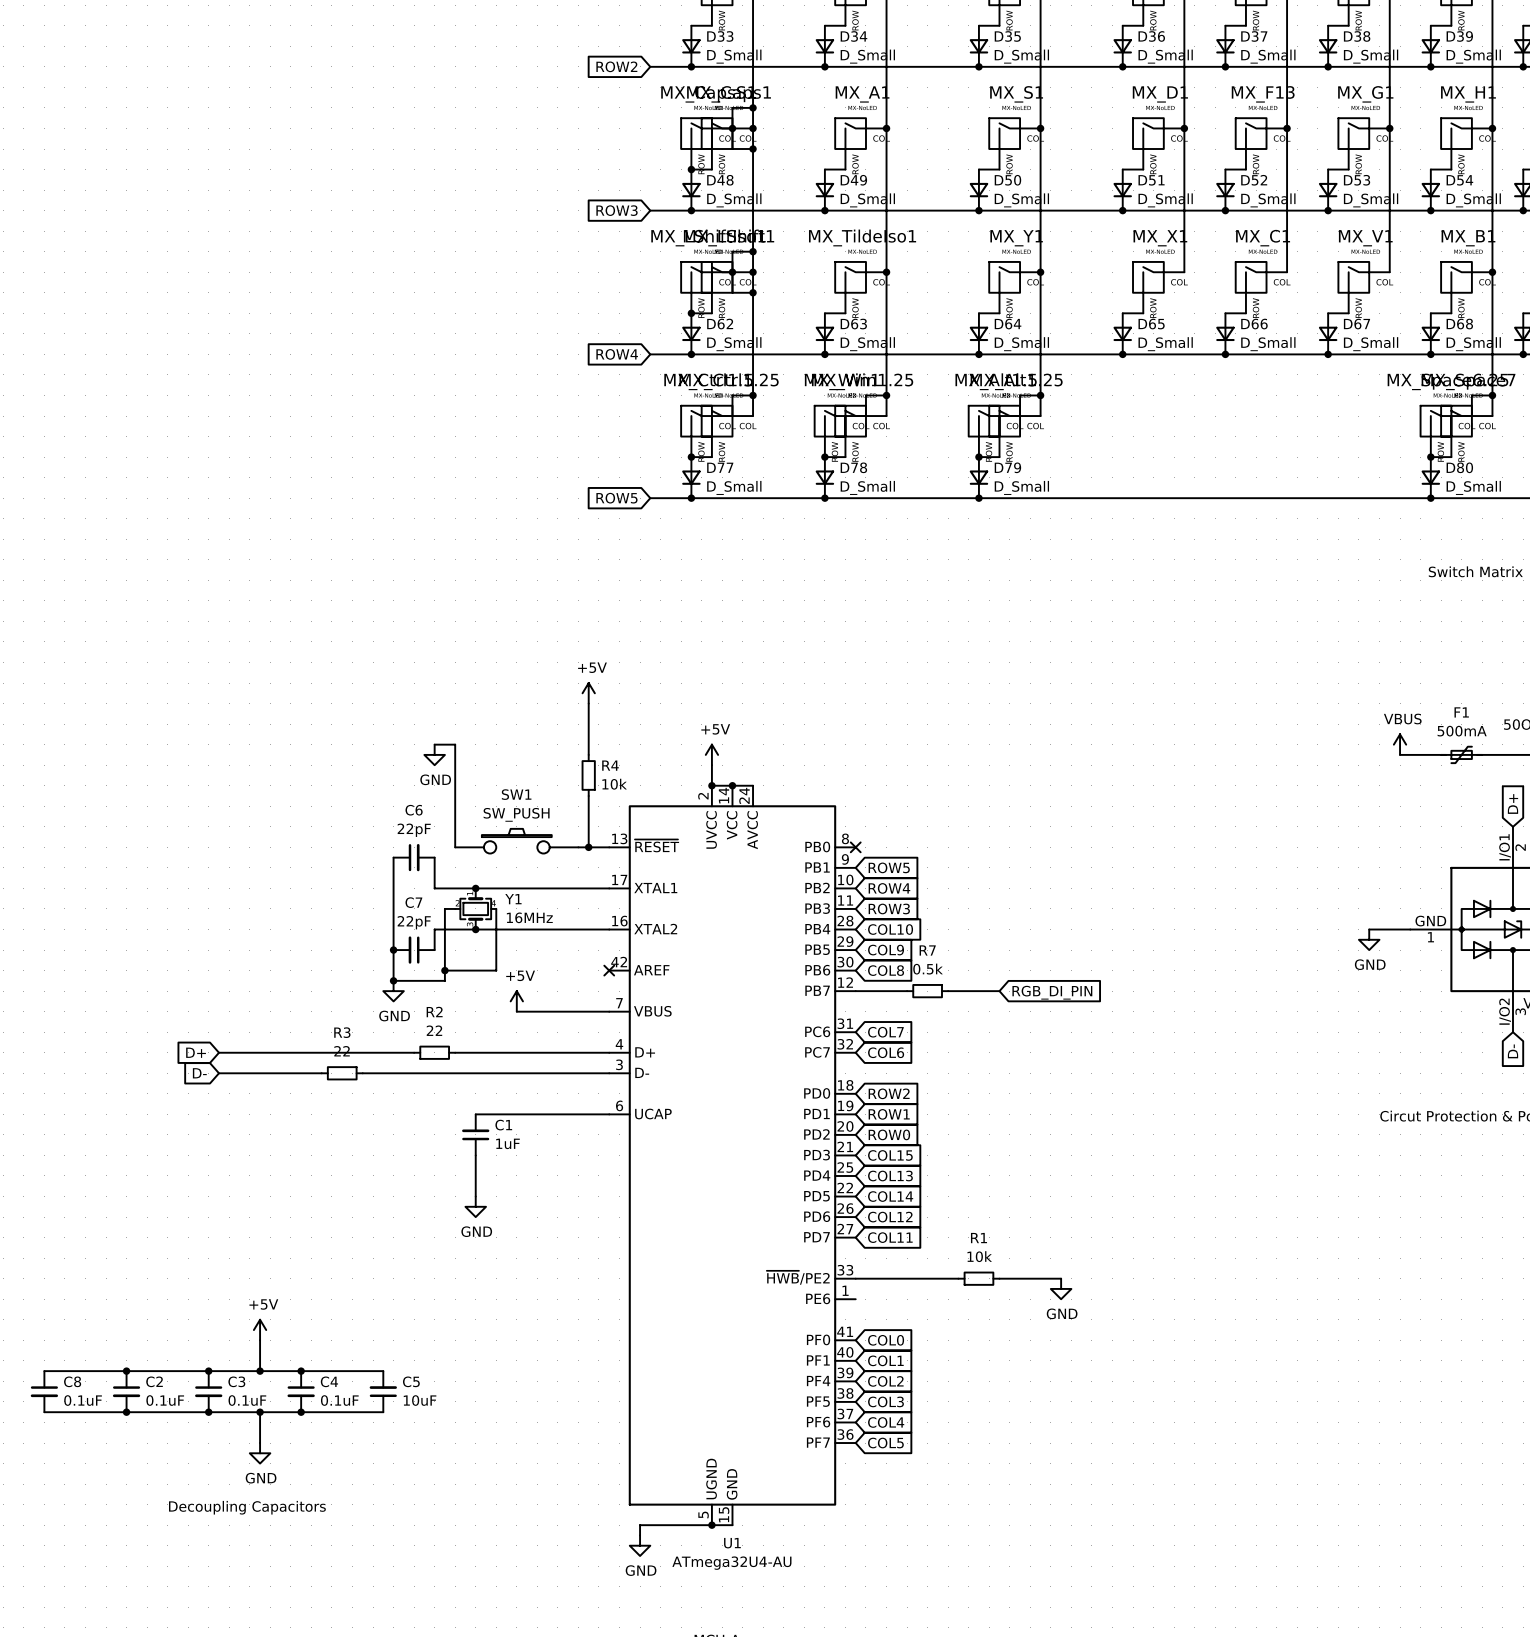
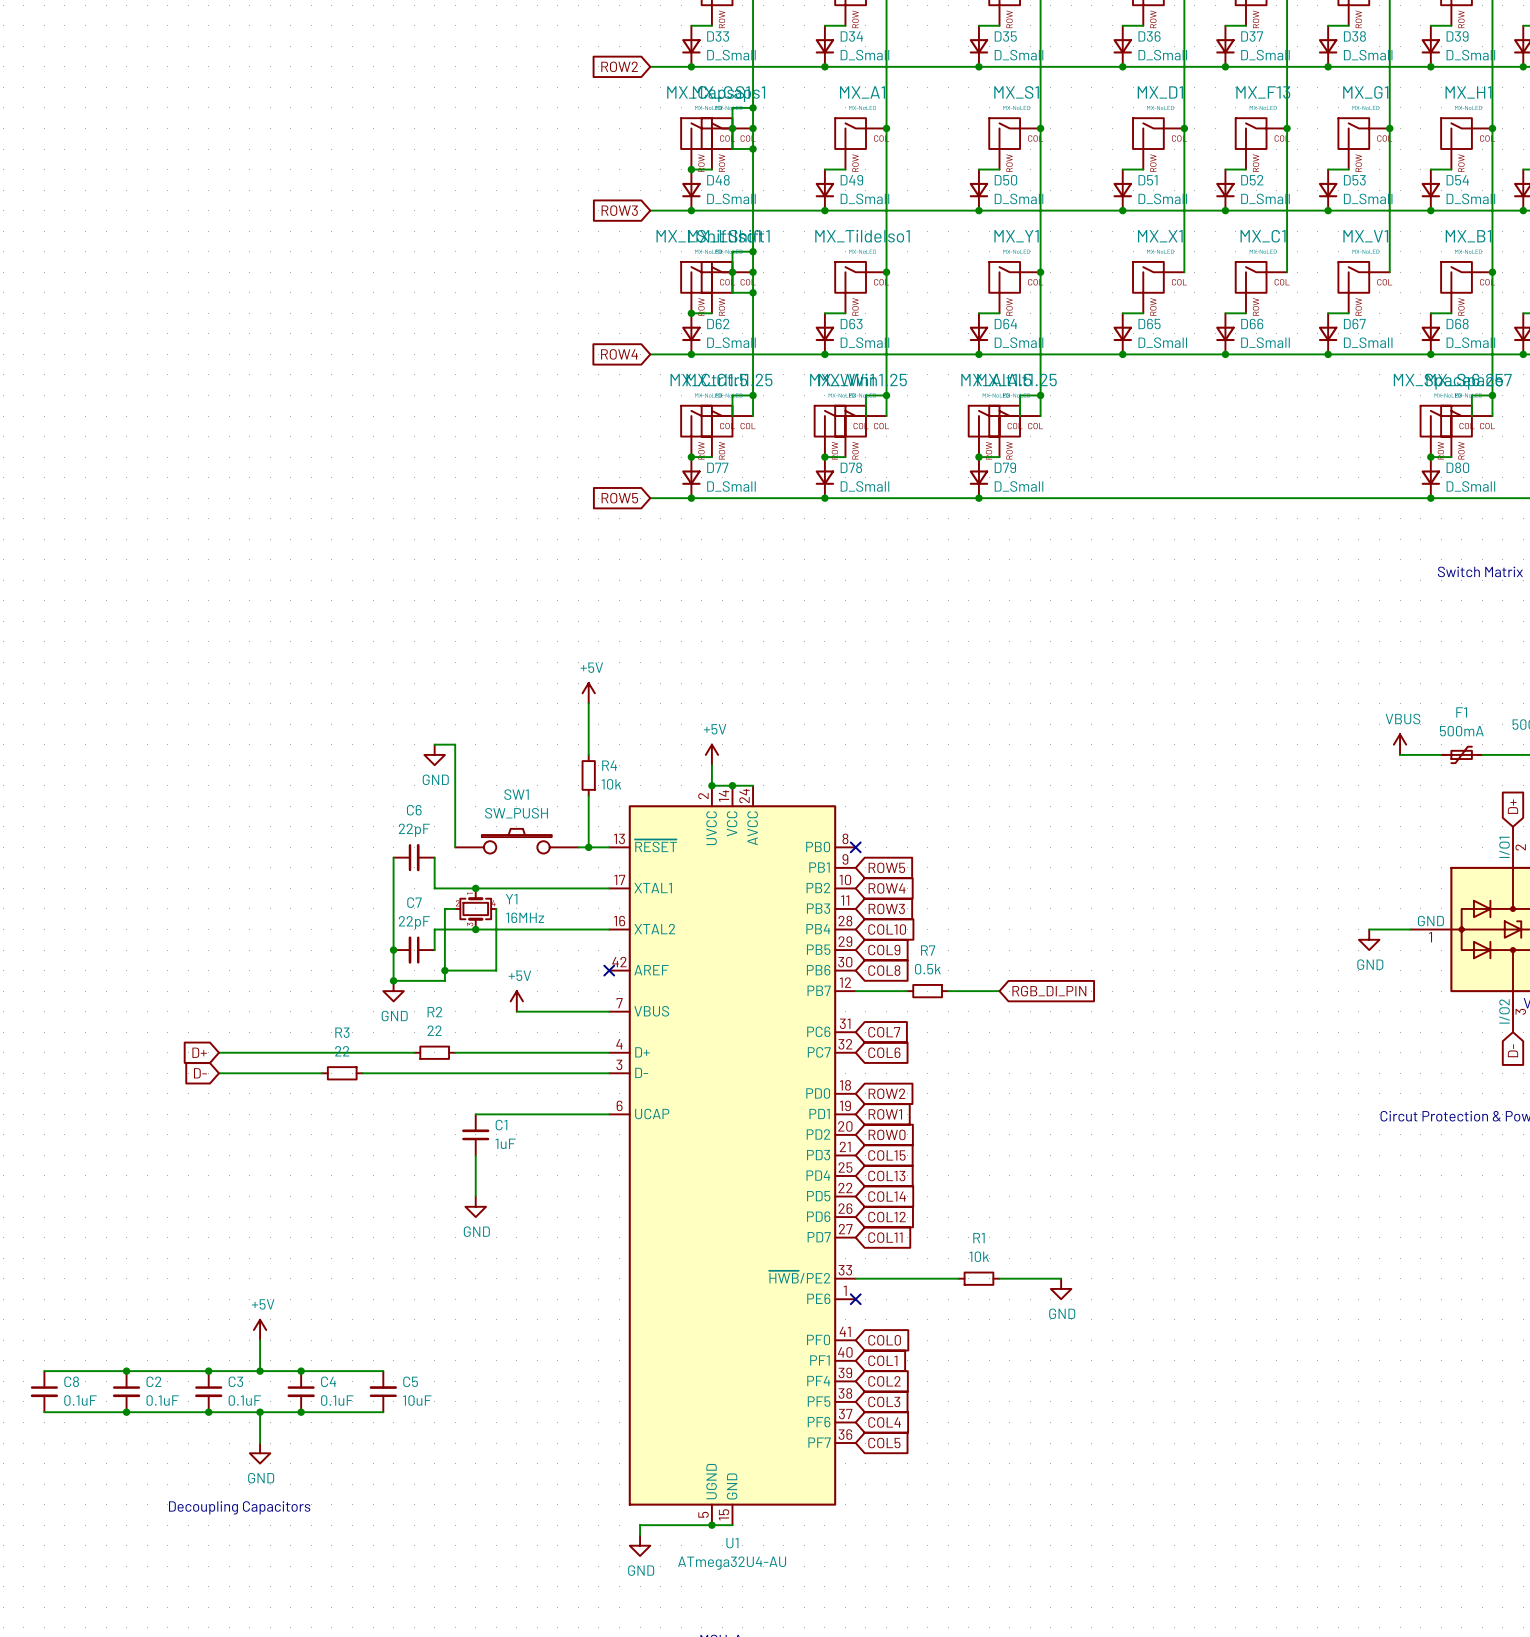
no-connect mark: none -> (855, 1299)

